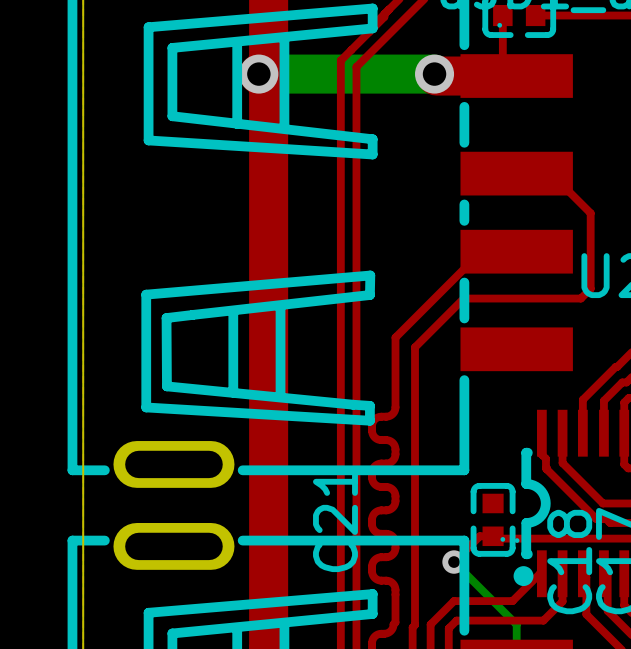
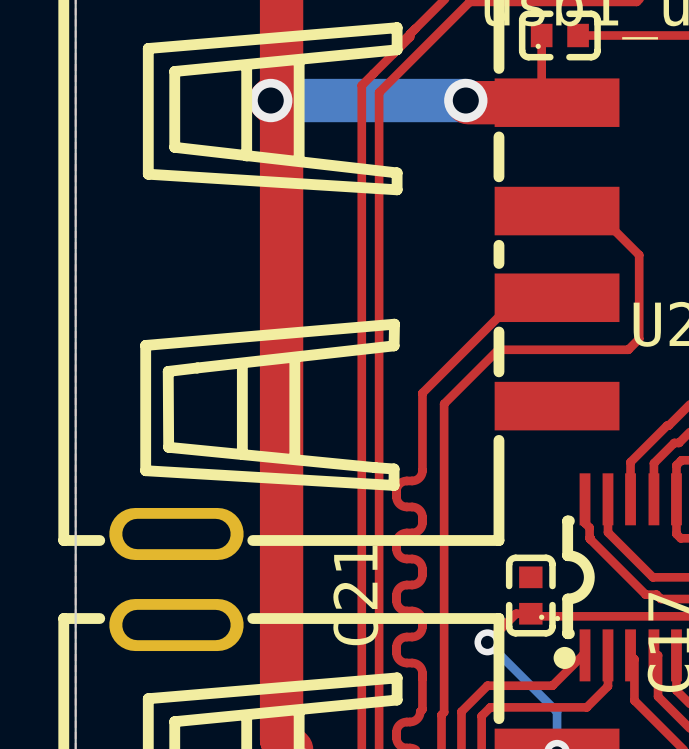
C18 name: C18 (569, 562) -> none

